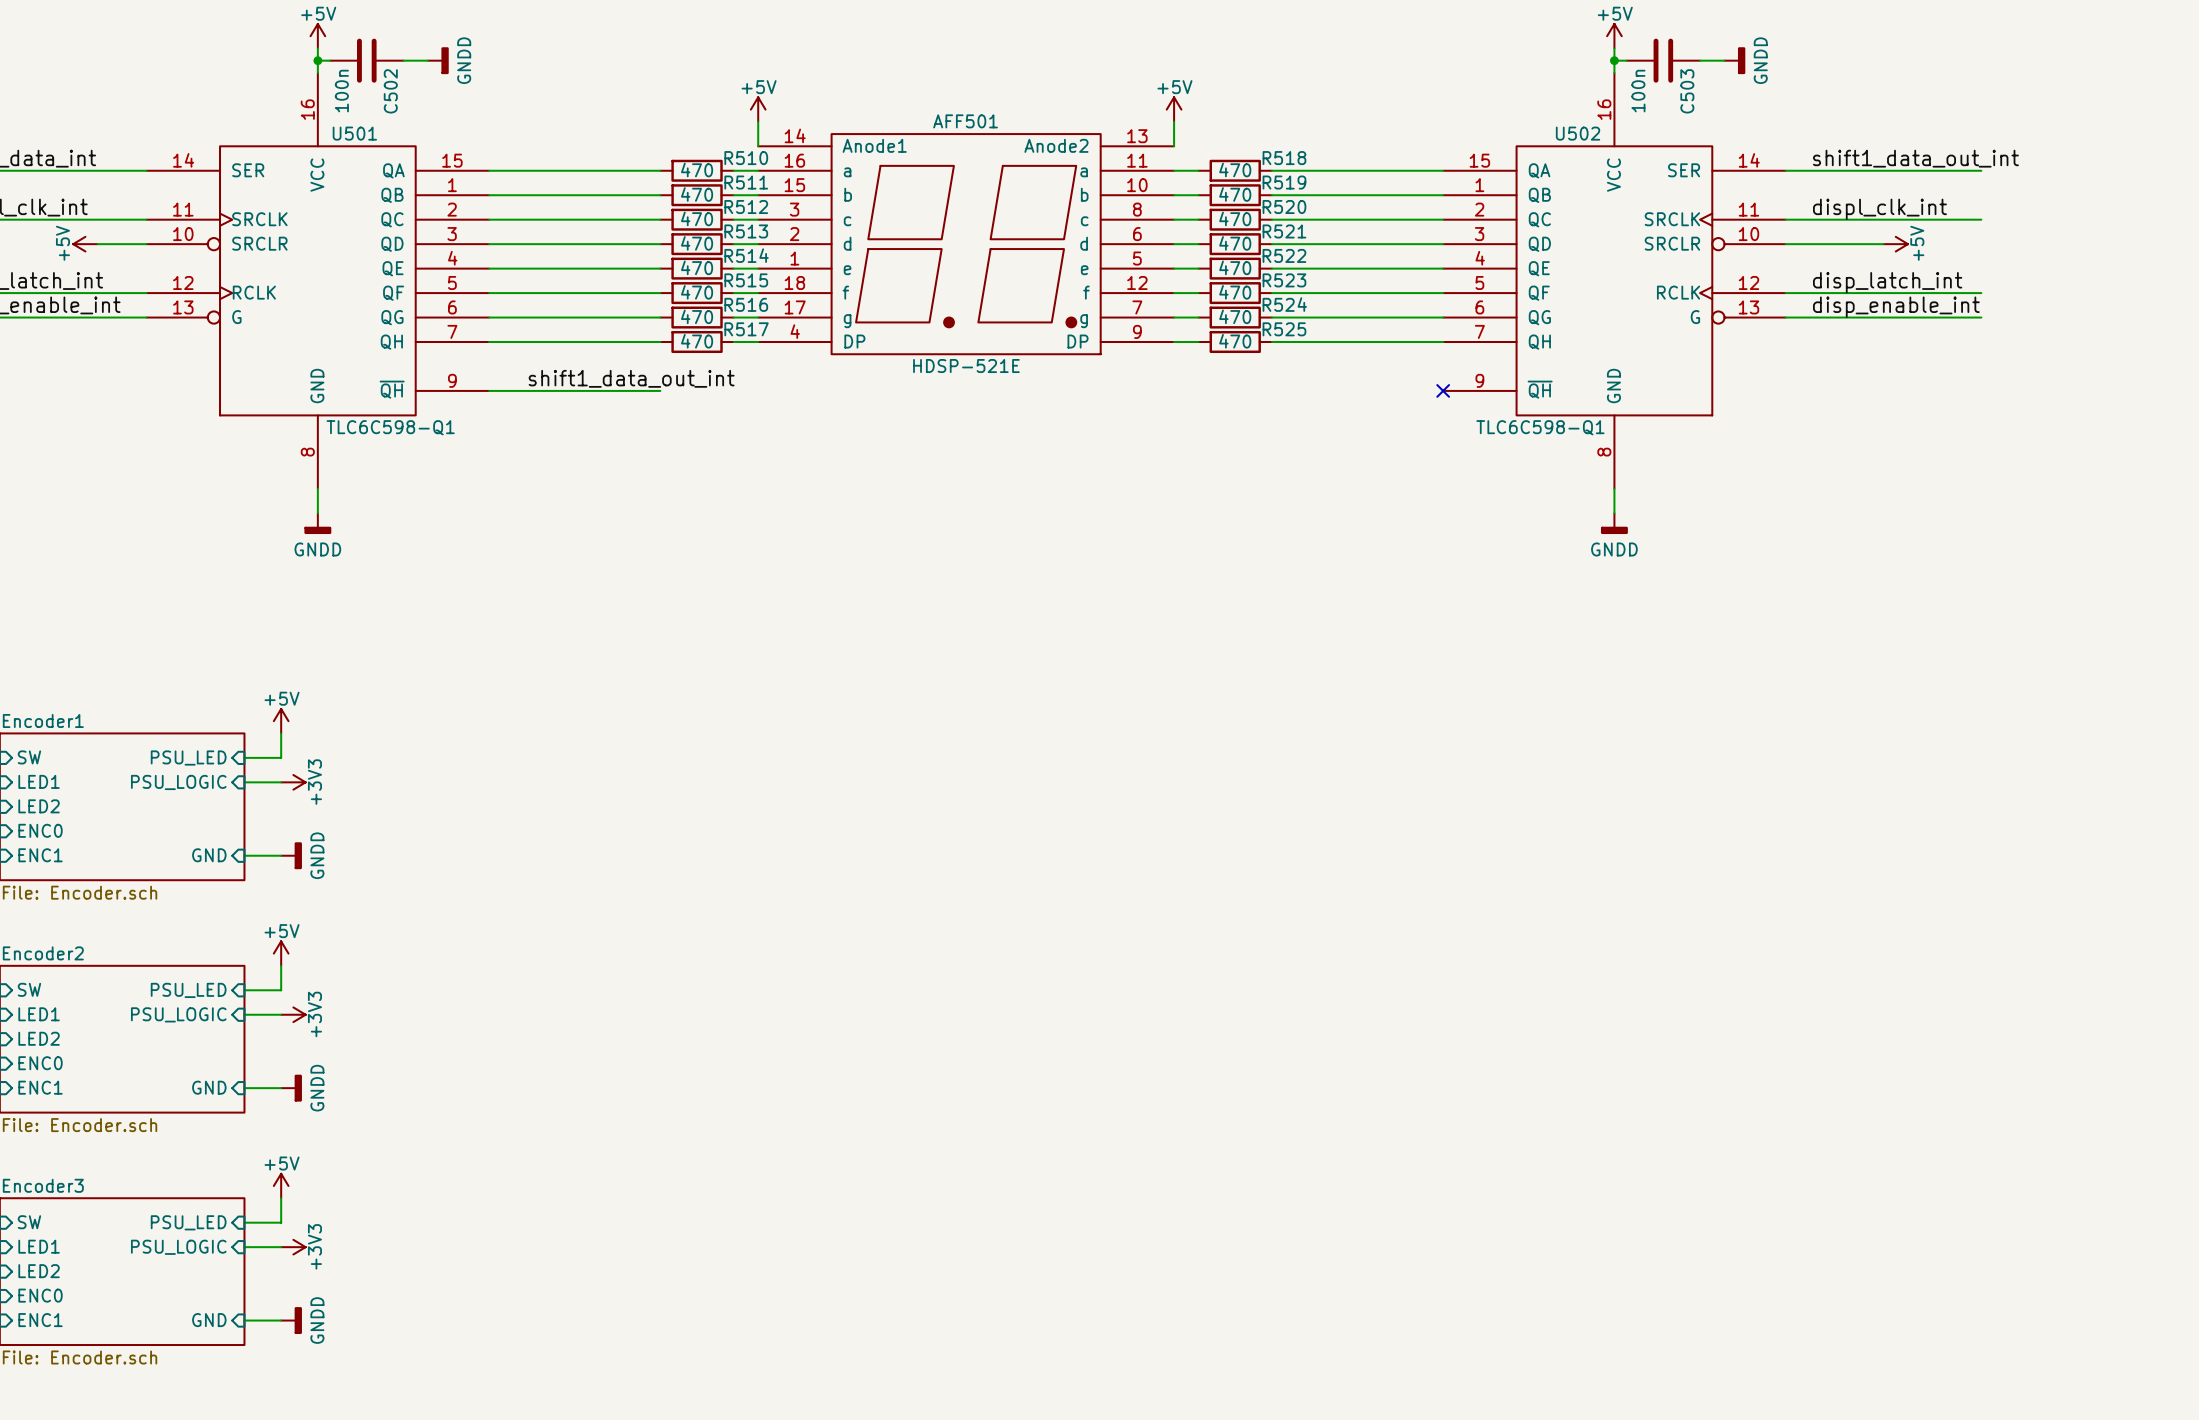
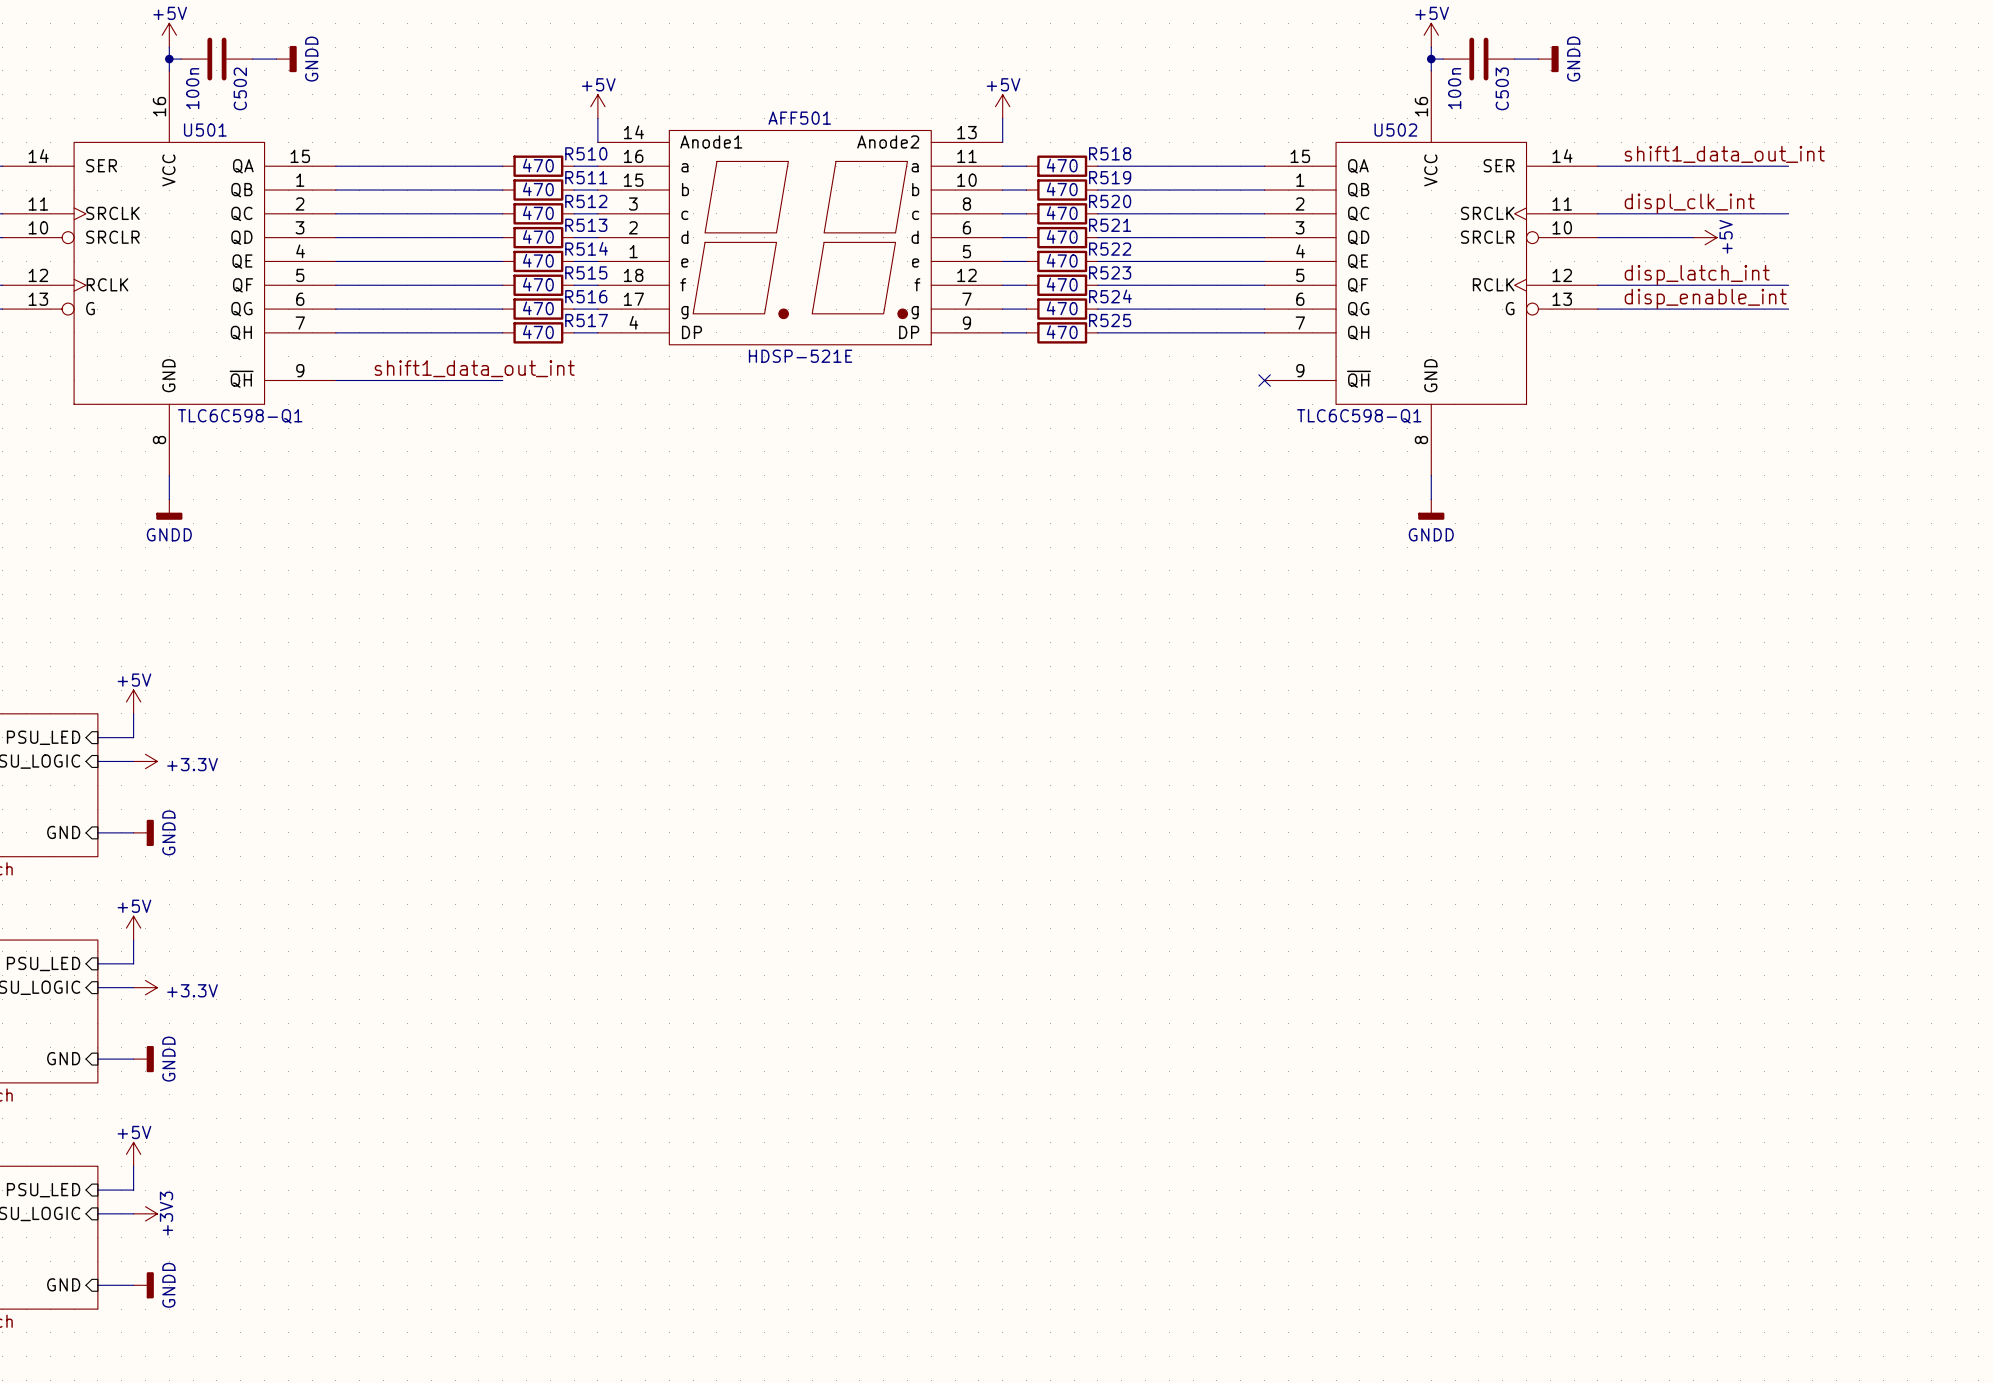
power symbol: +3V3 (293, 782) -> +3.3V (145, 761)
power symbol: +3V3 (293, 1014) -> +3.3V (145, 987)

